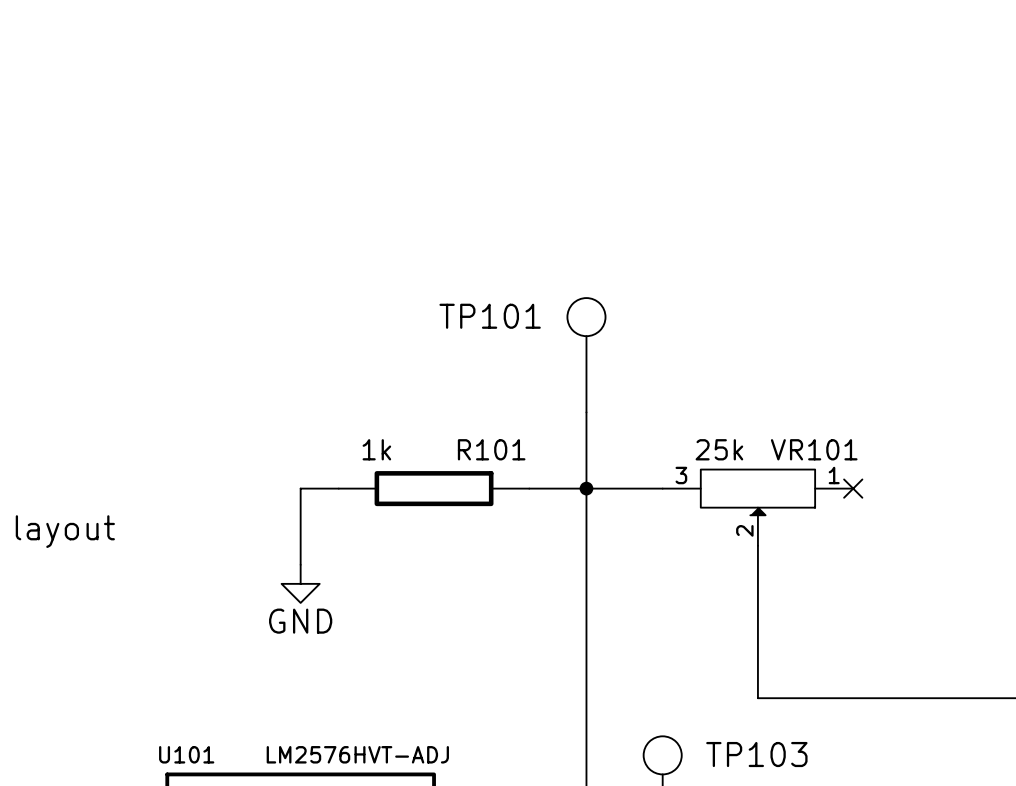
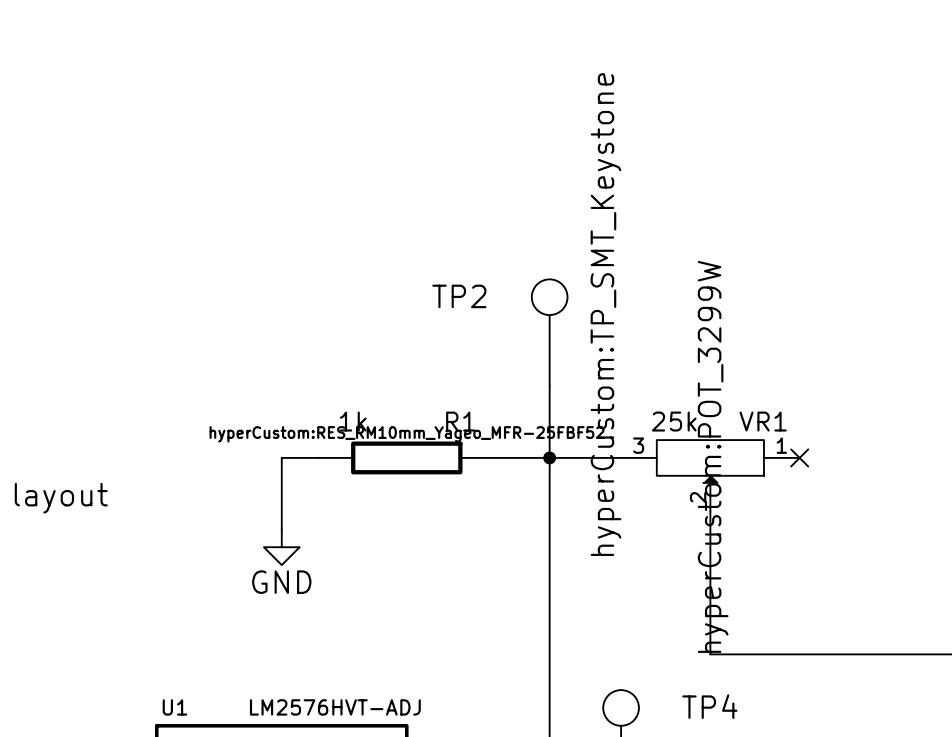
TP101 name: TP101 (490, 316) -> TP2 (459, 296)
TP101 text: none -> hyperCustom:TP_SMT_Keystone (606, 314)
R101 name: R101 (491, 449) -> R1 (460, 421)
VR101 name: VR101 (814, 449) -> VR1 (763, 421)
R101 text: none -> hyperCustom:RES_RM10mm_Yageo_MFR-25FBF52 (407, 434)
VR101 text: none -> hyperCustom:POT_3299W (713, 456)
U101 name: U101 (186, 754) -> U1 (174, 707)
TP103 name: TP103 (756, 754) -> TP4 (709, 706)

